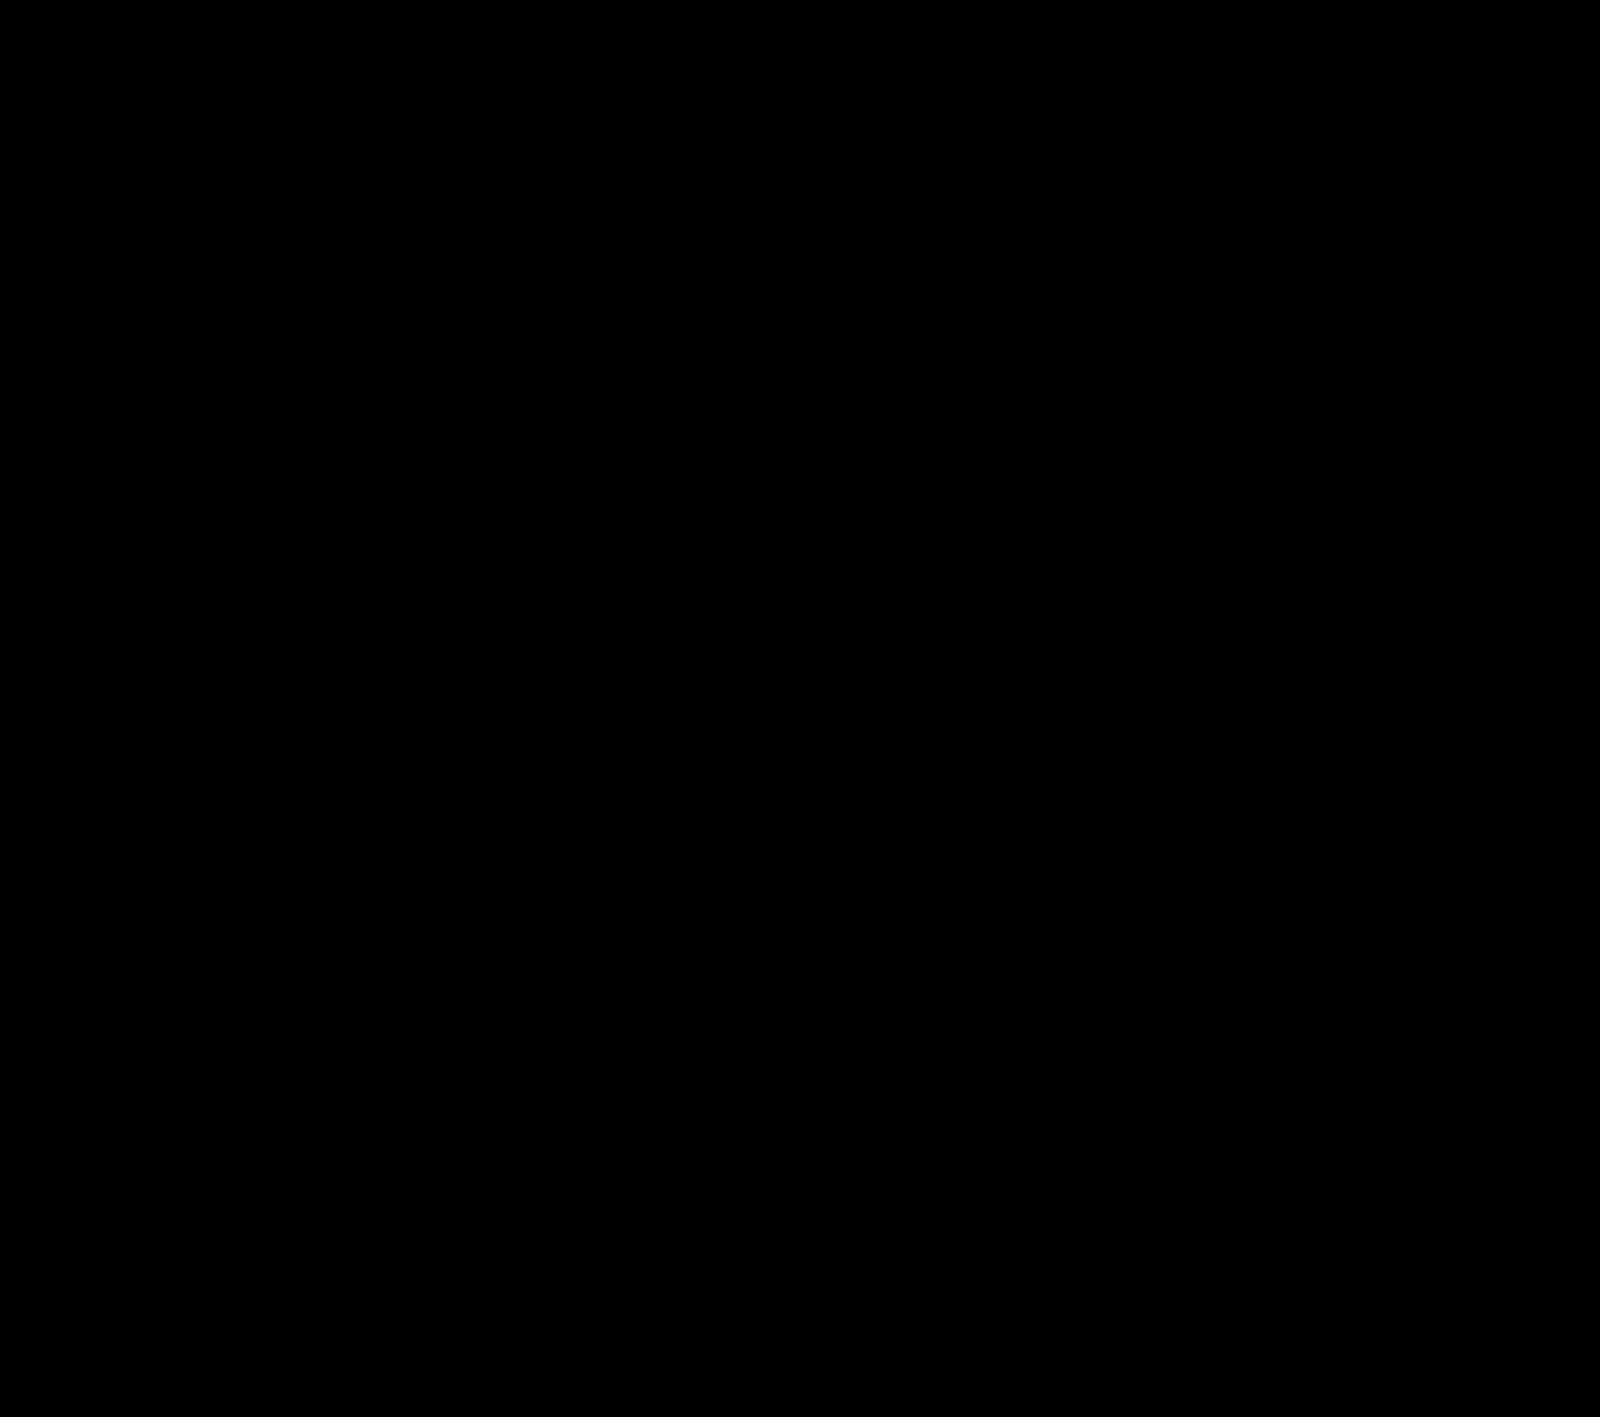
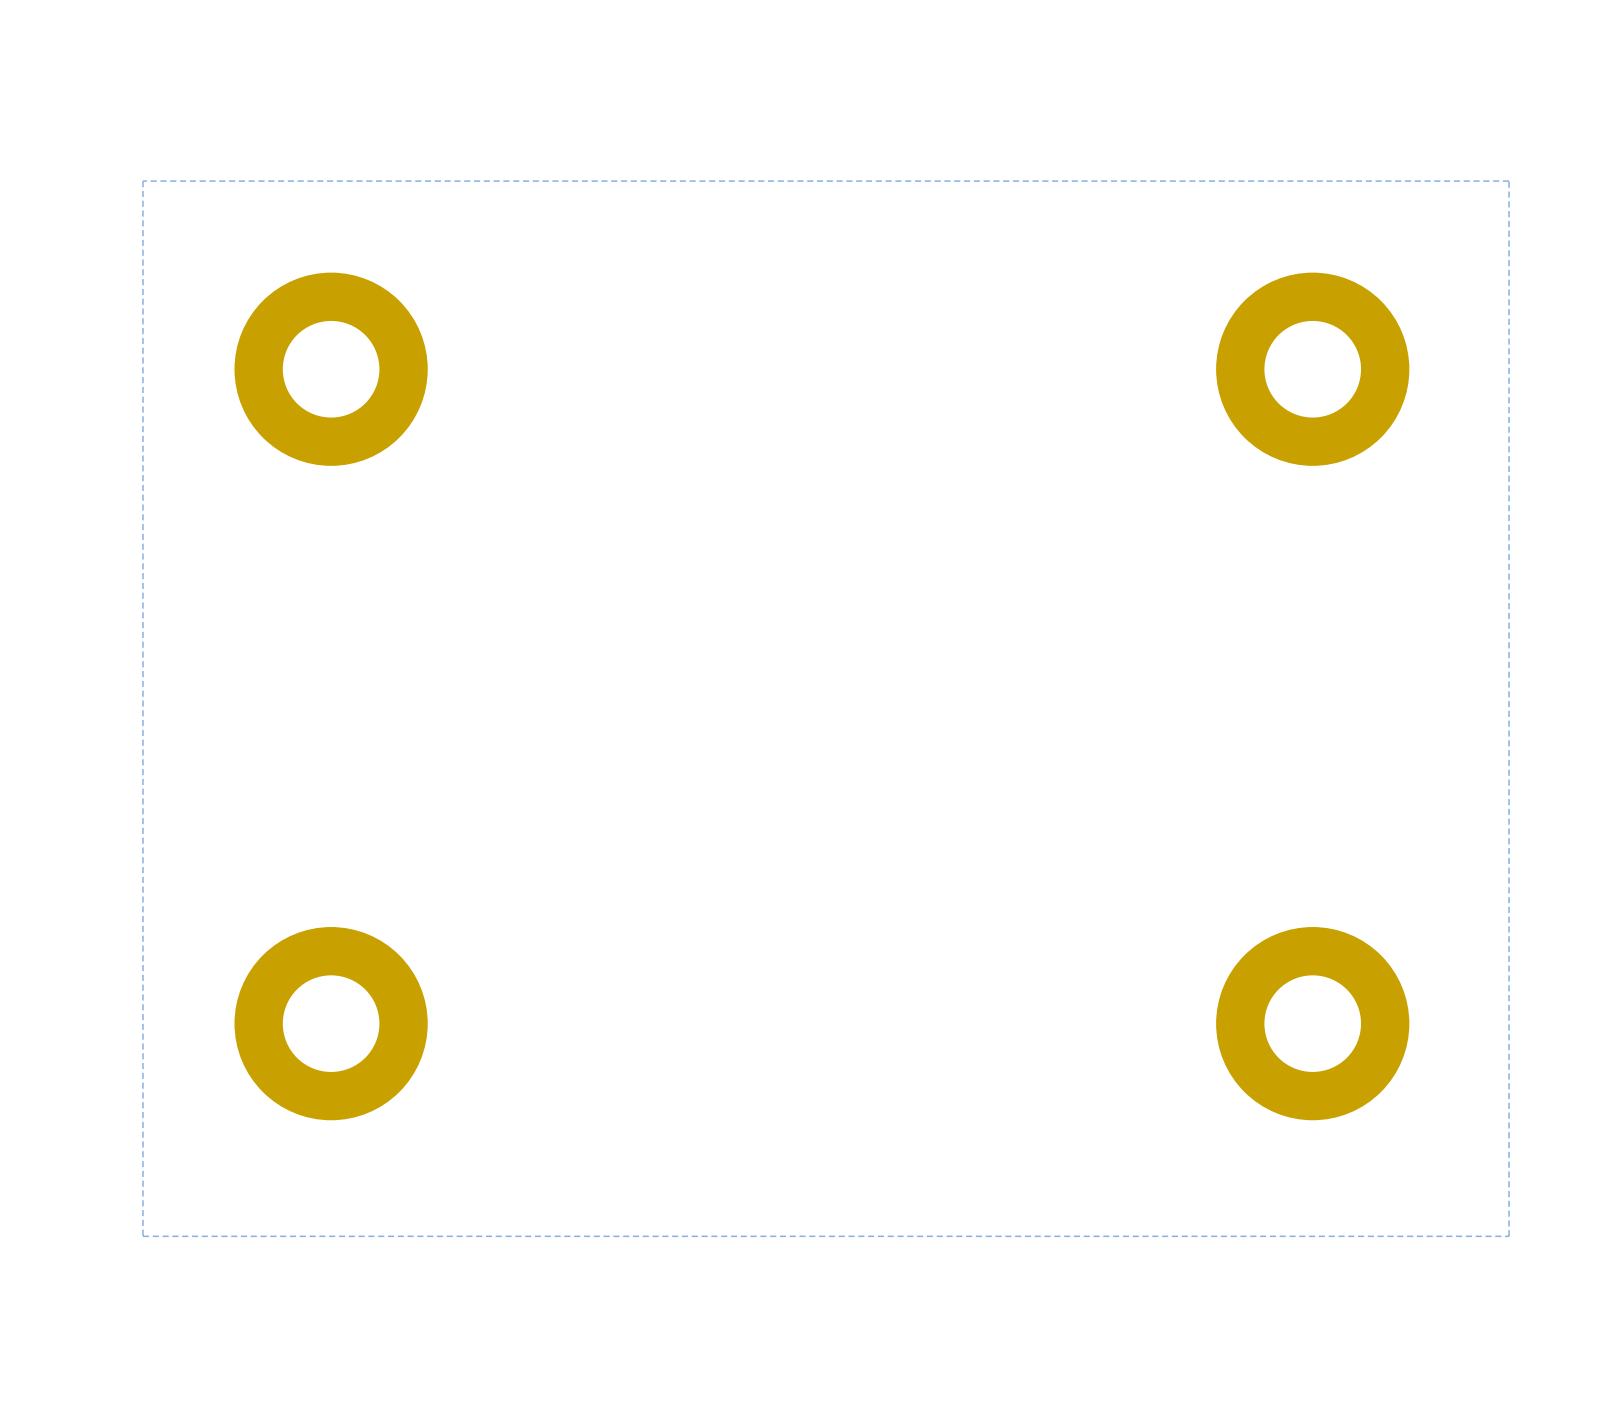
zone outline: none -> (1509, 181) (1509, 1236) (142, 1236) (142, 181) (1509, 181)
part: none -> (331, 369)
part: none -> (1312, 369)
part: none -> (331, 1023)
part: none -> (1312, 1023)

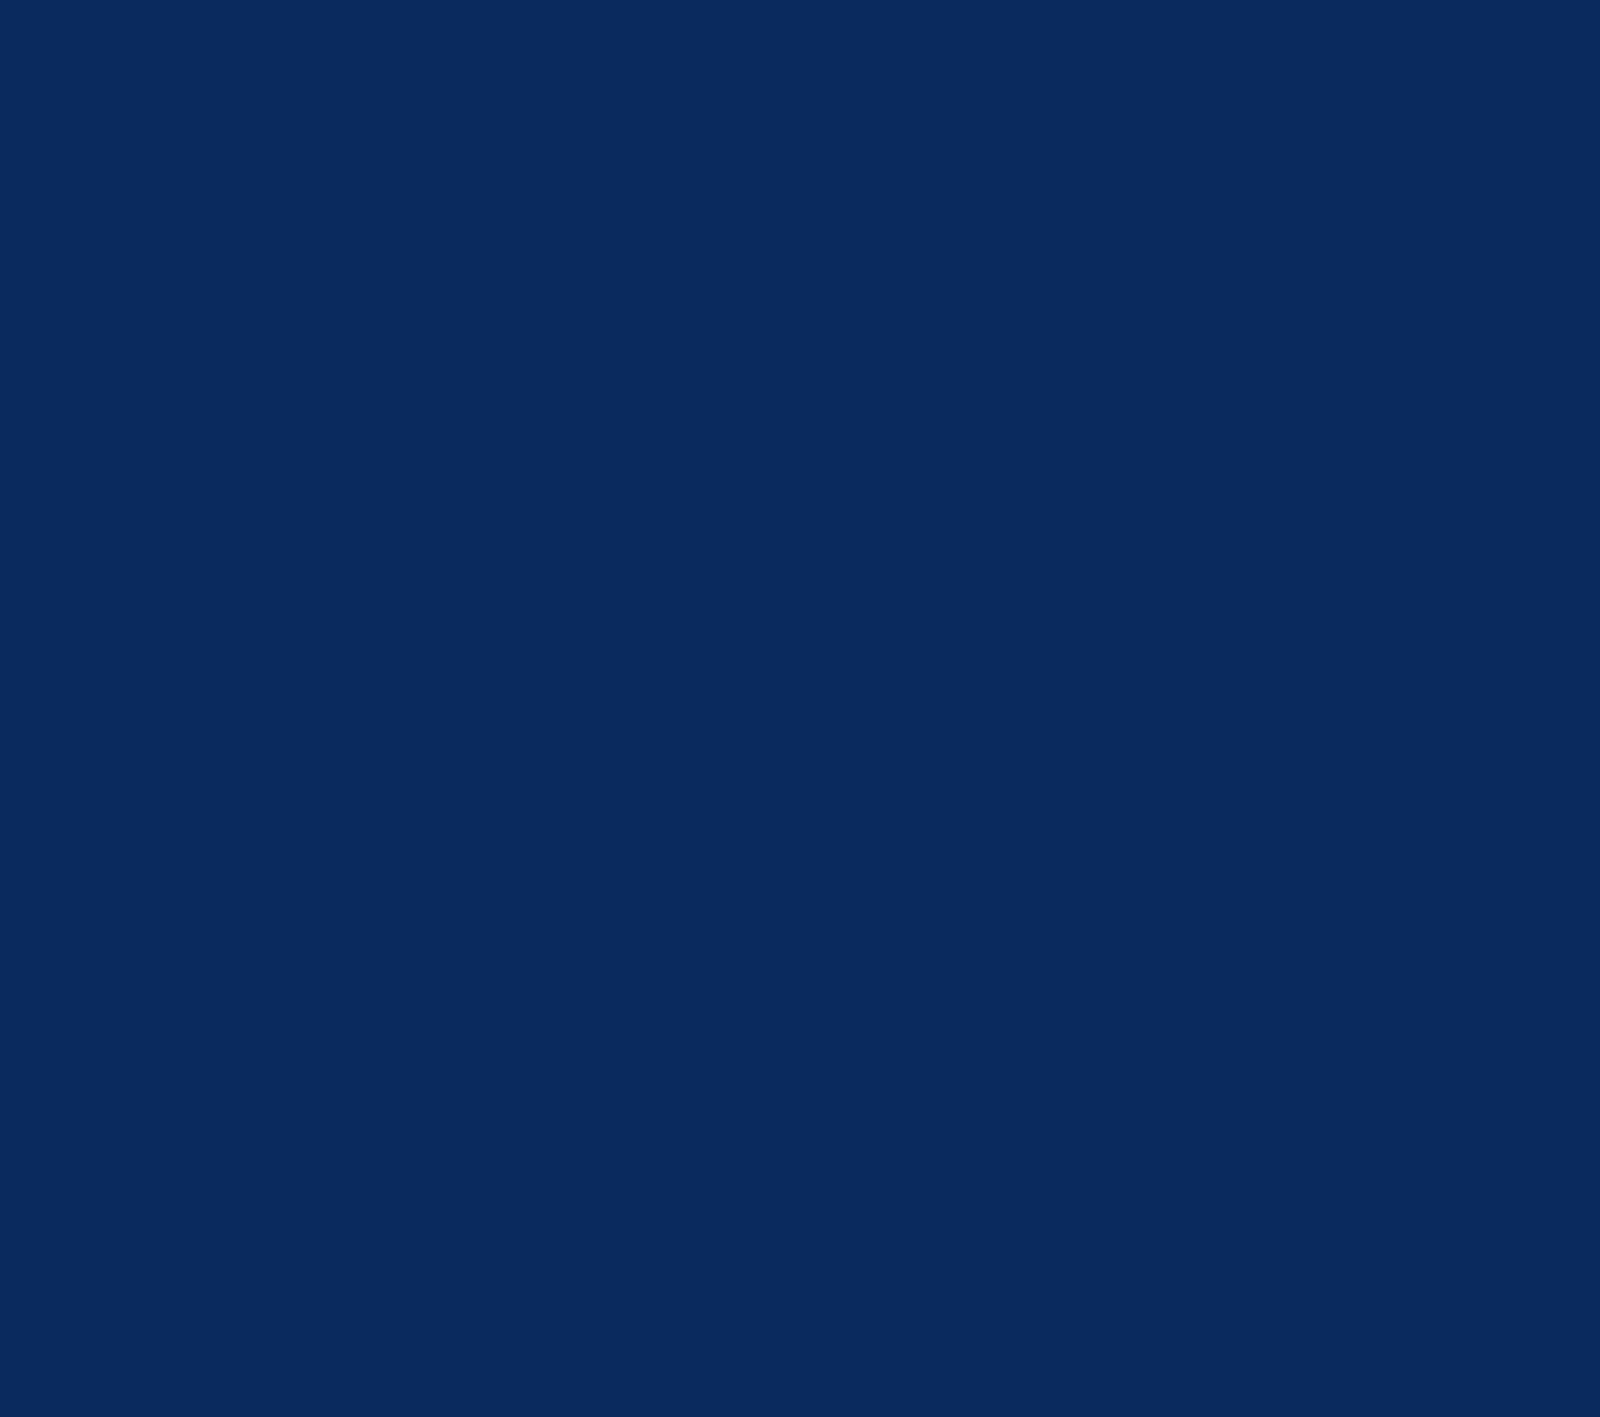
zone outline: (1509, 181) (1509, 1236) (142, 1236) (142, 181) (1509, 181) -> none
part: (331, 369) -> none
part: (1312, 369) -> none
part: (331, 1023) -> none
part: (1312, 1023) -> none

